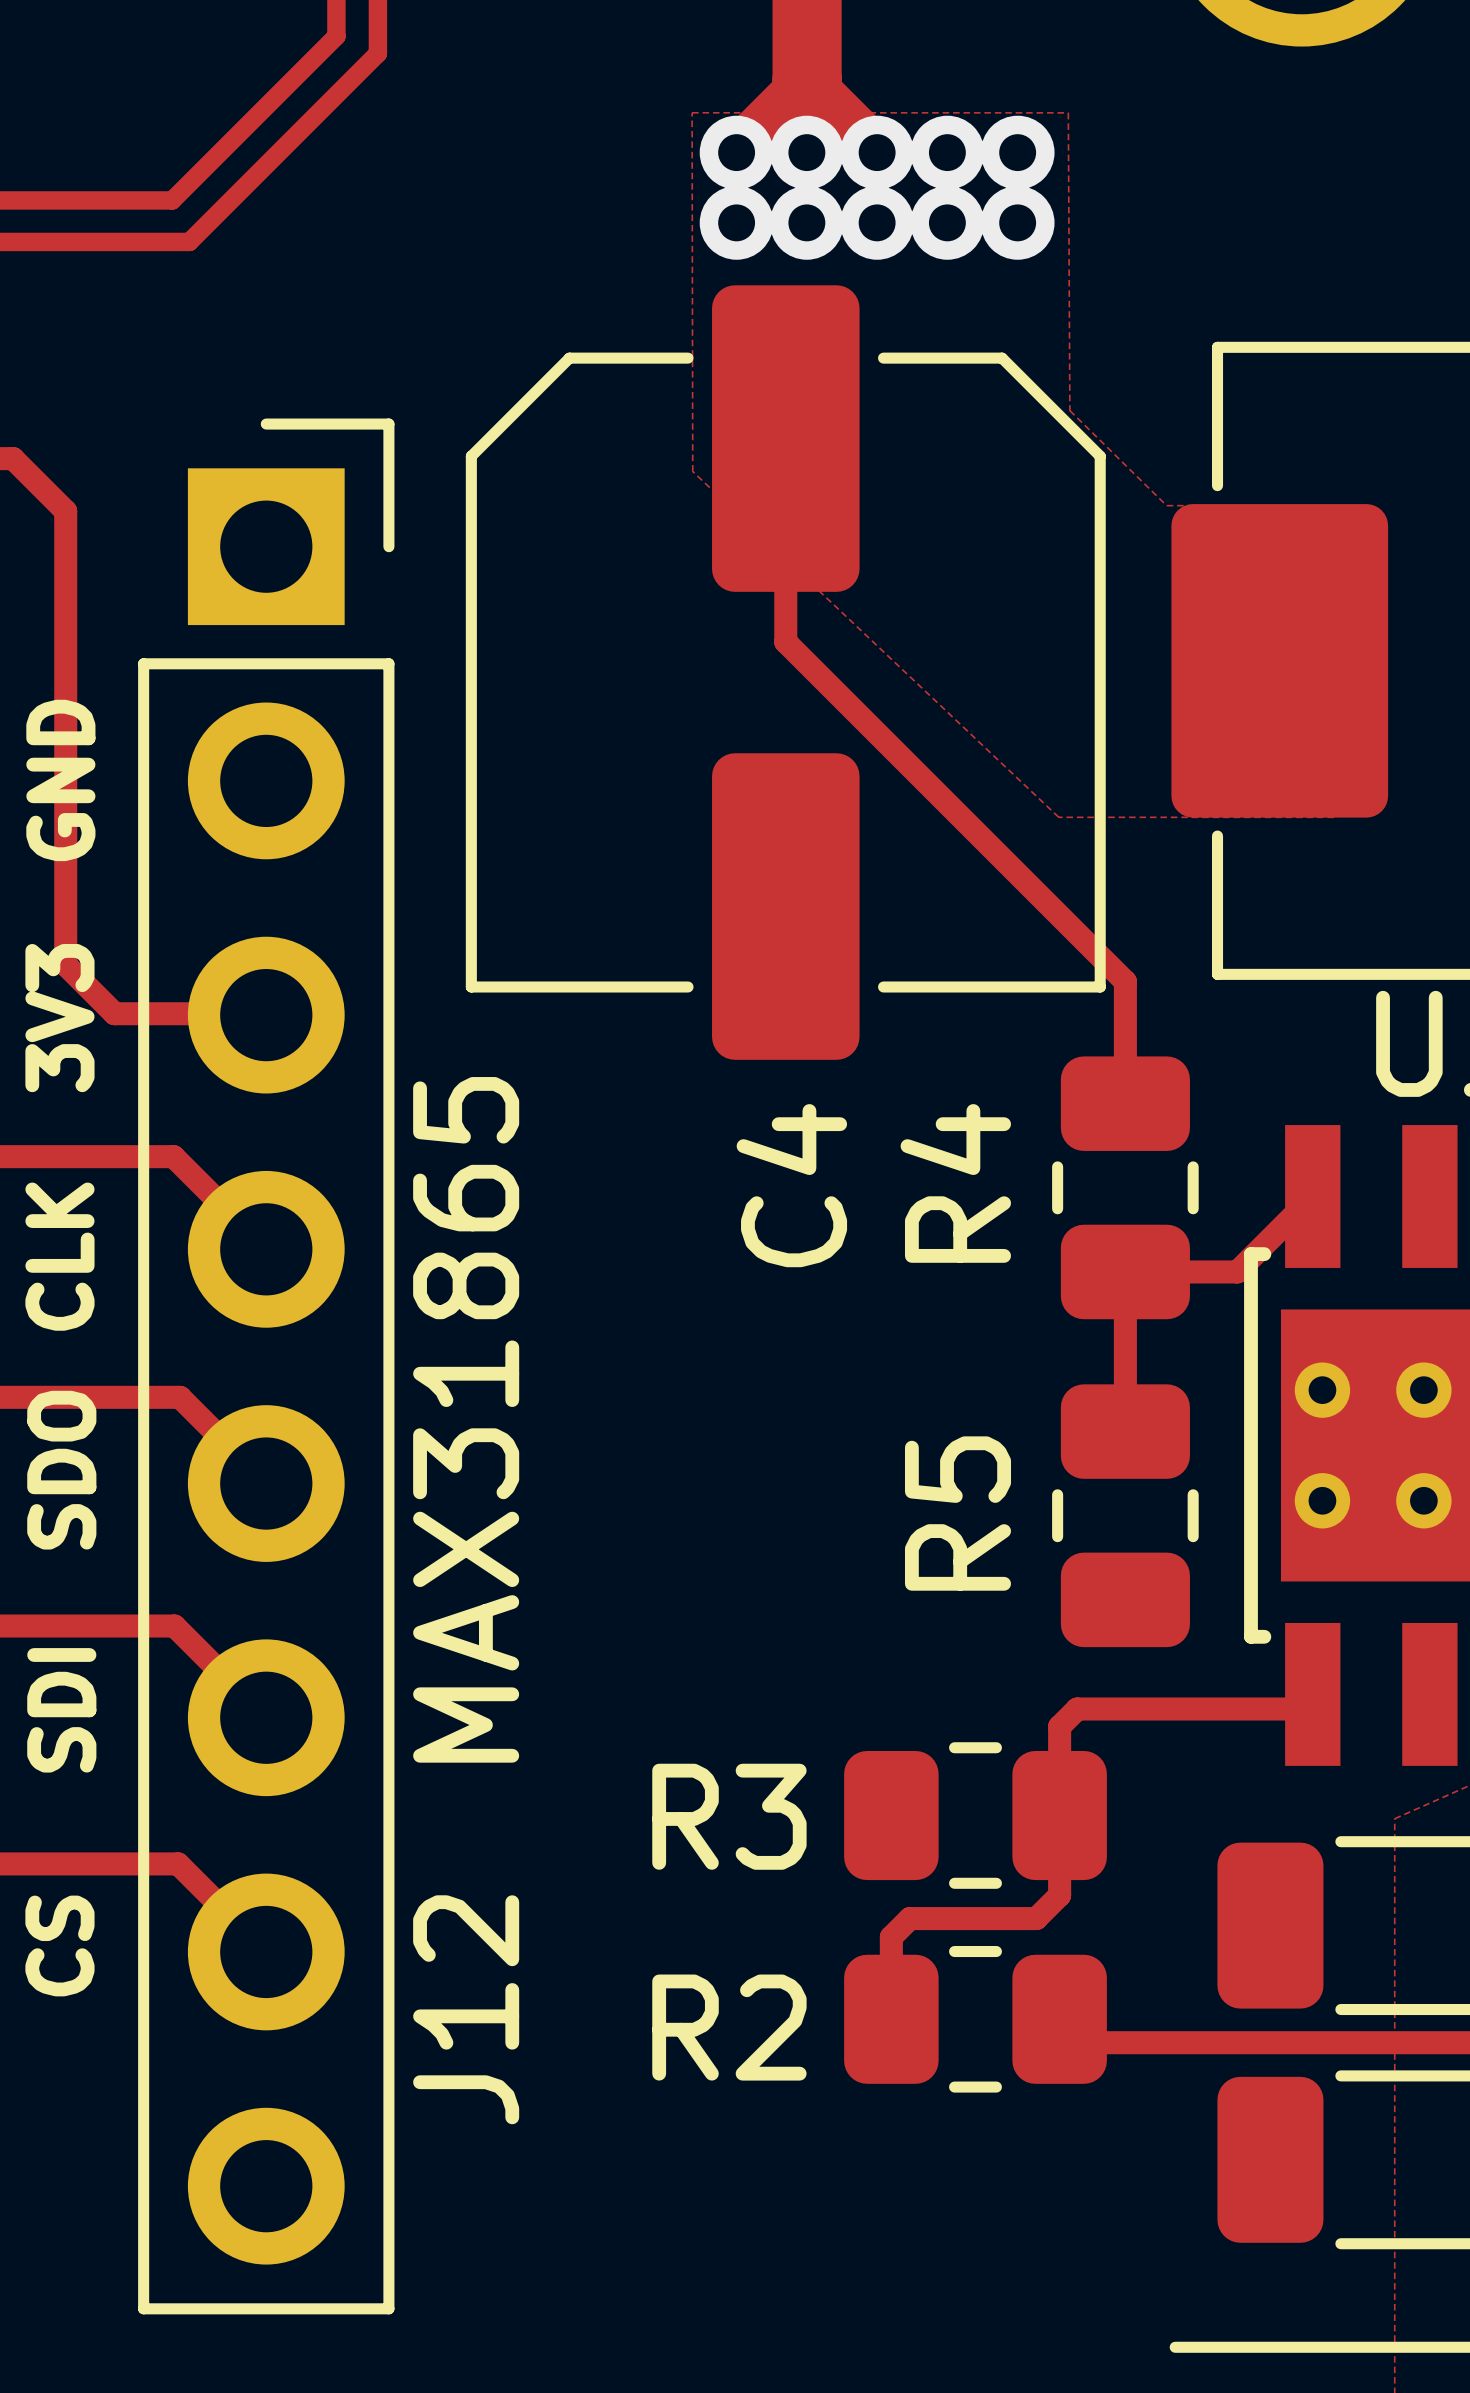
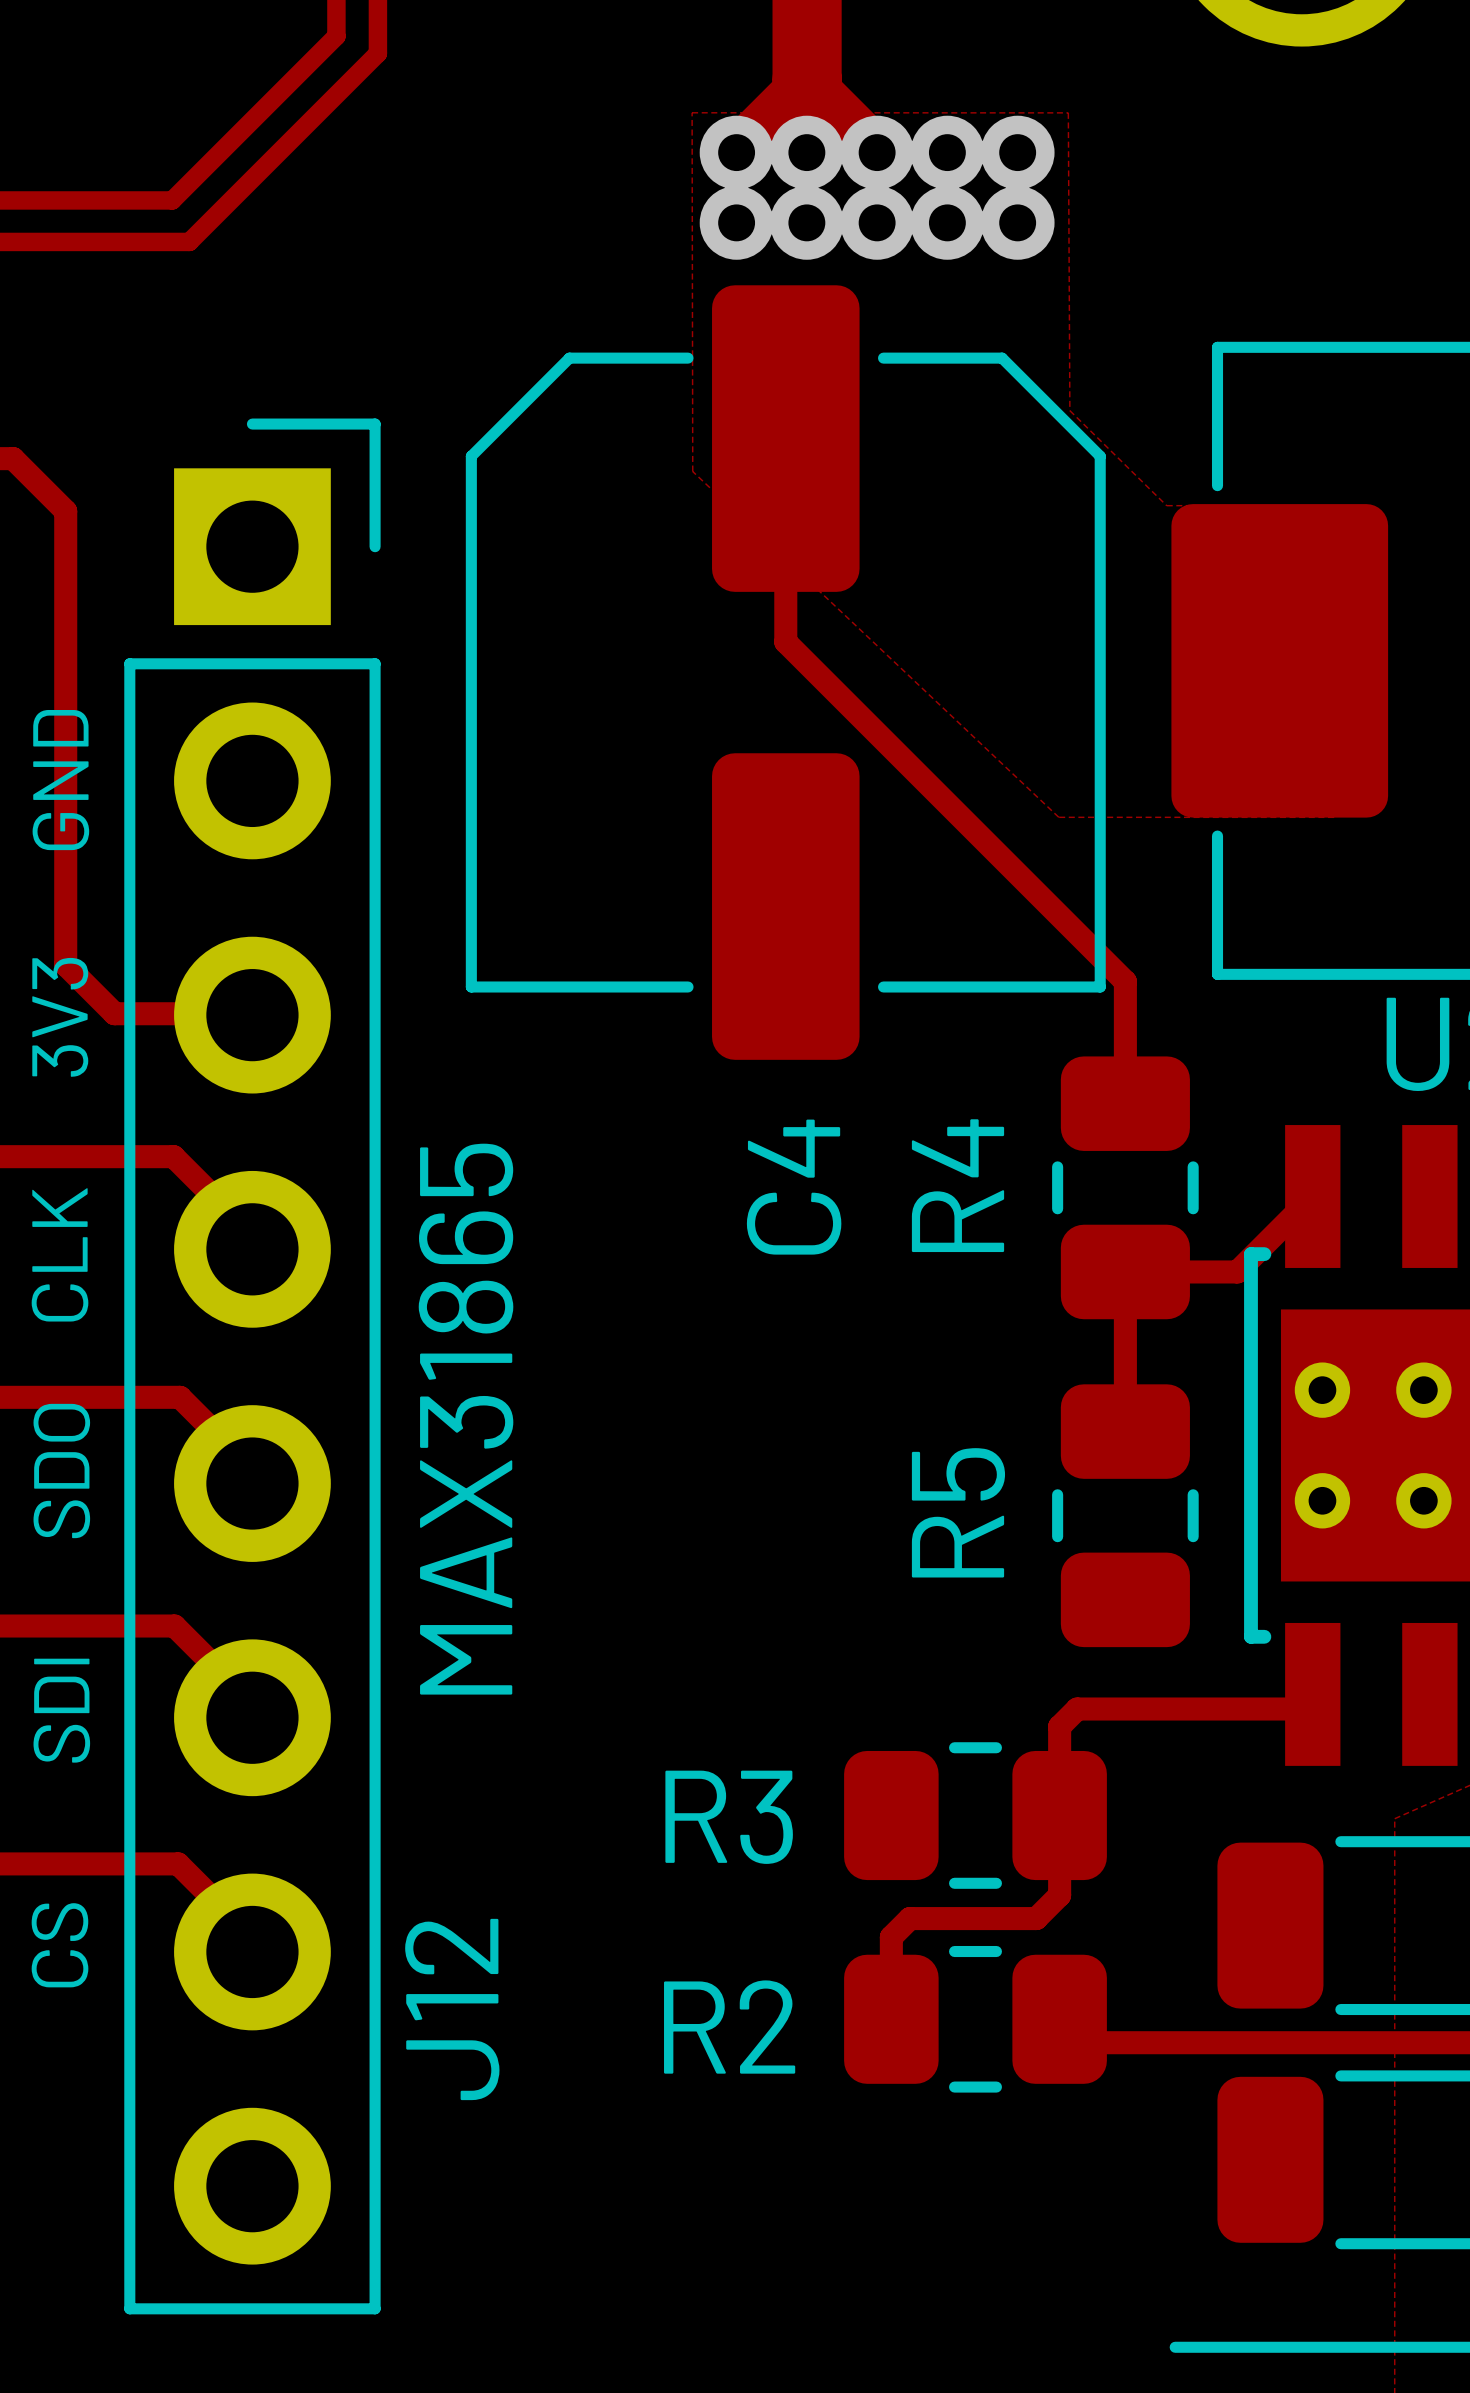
J12 position: (266, 1366) -> (252, 1366)

